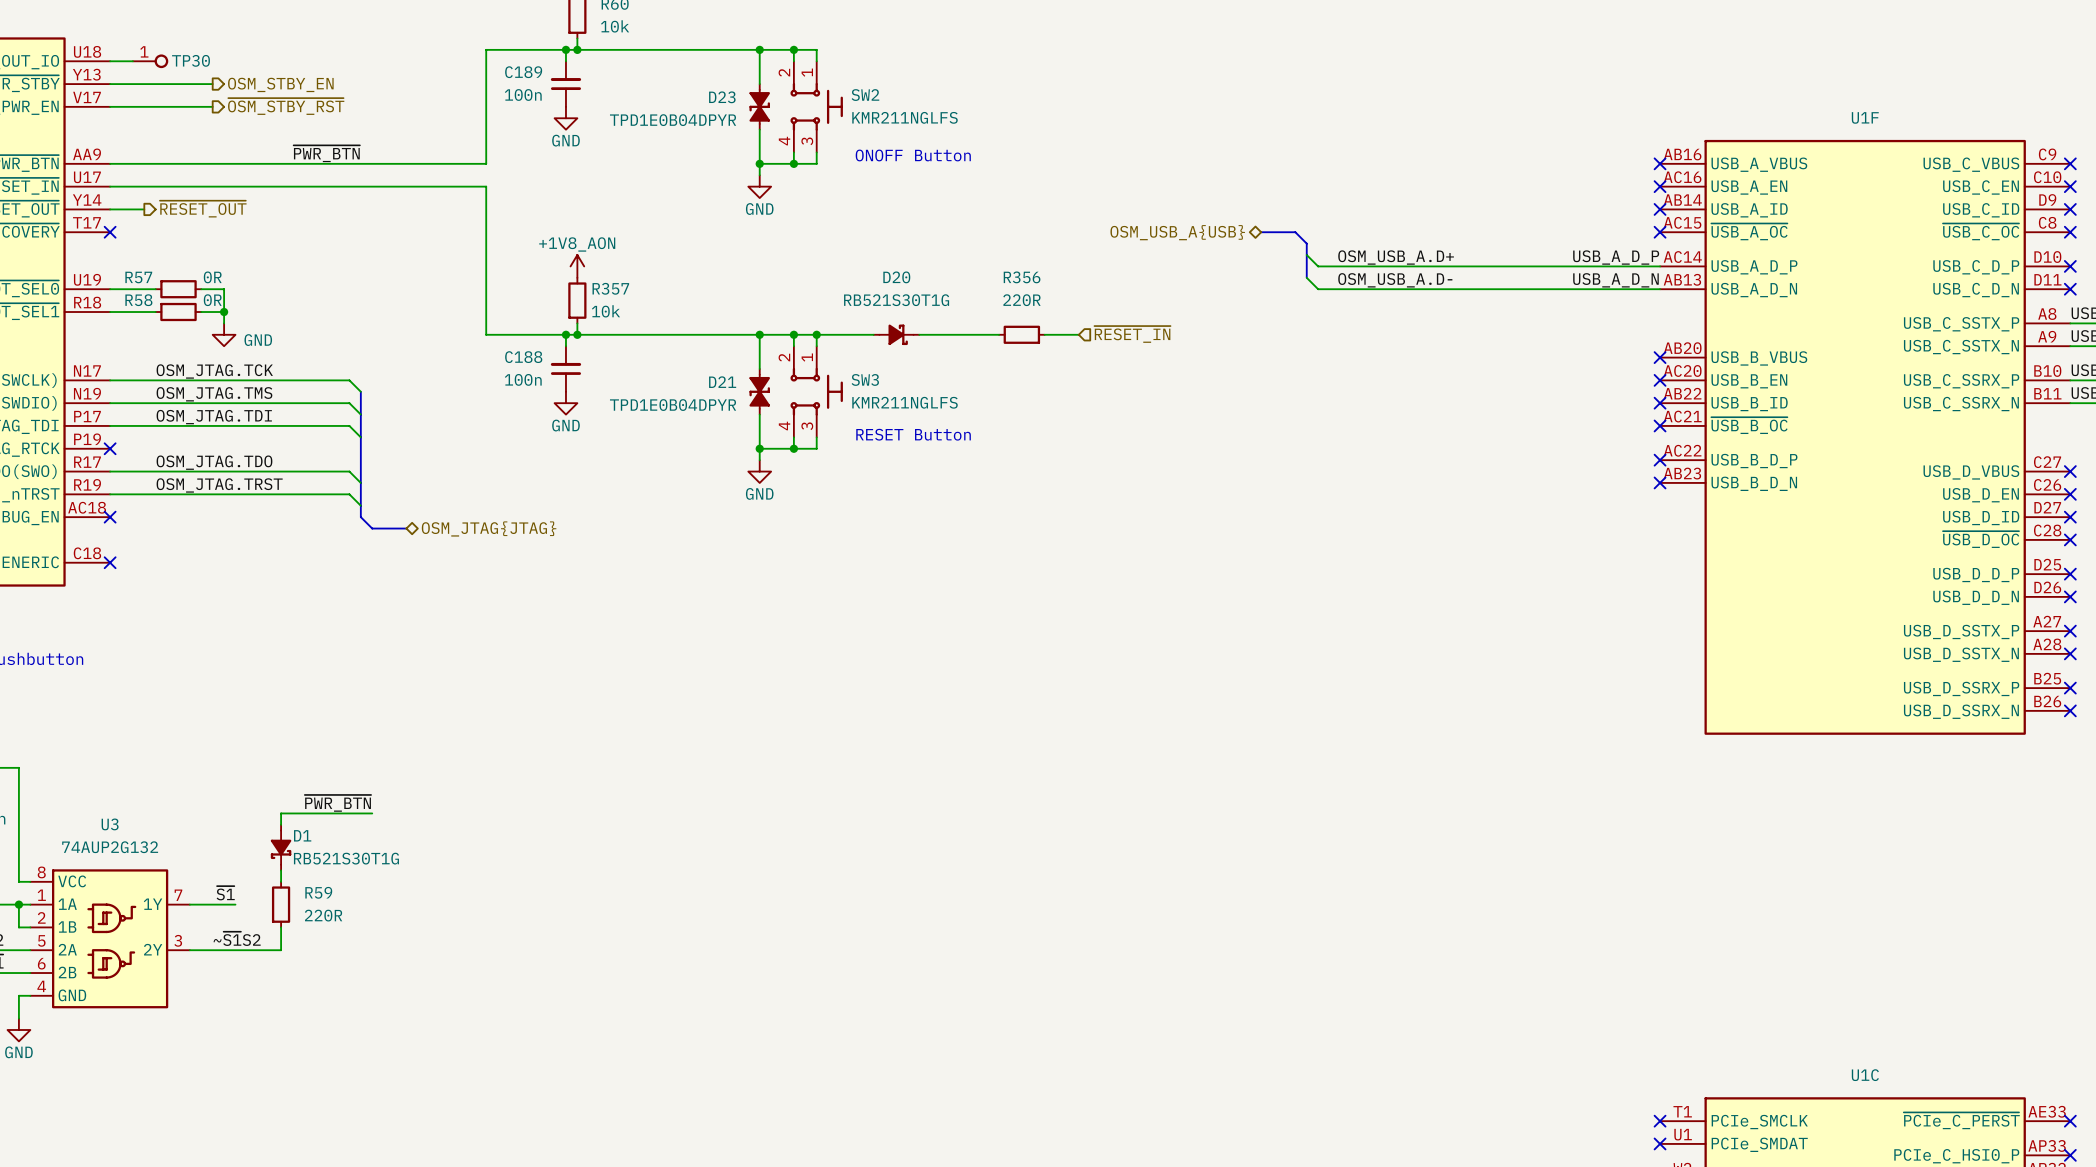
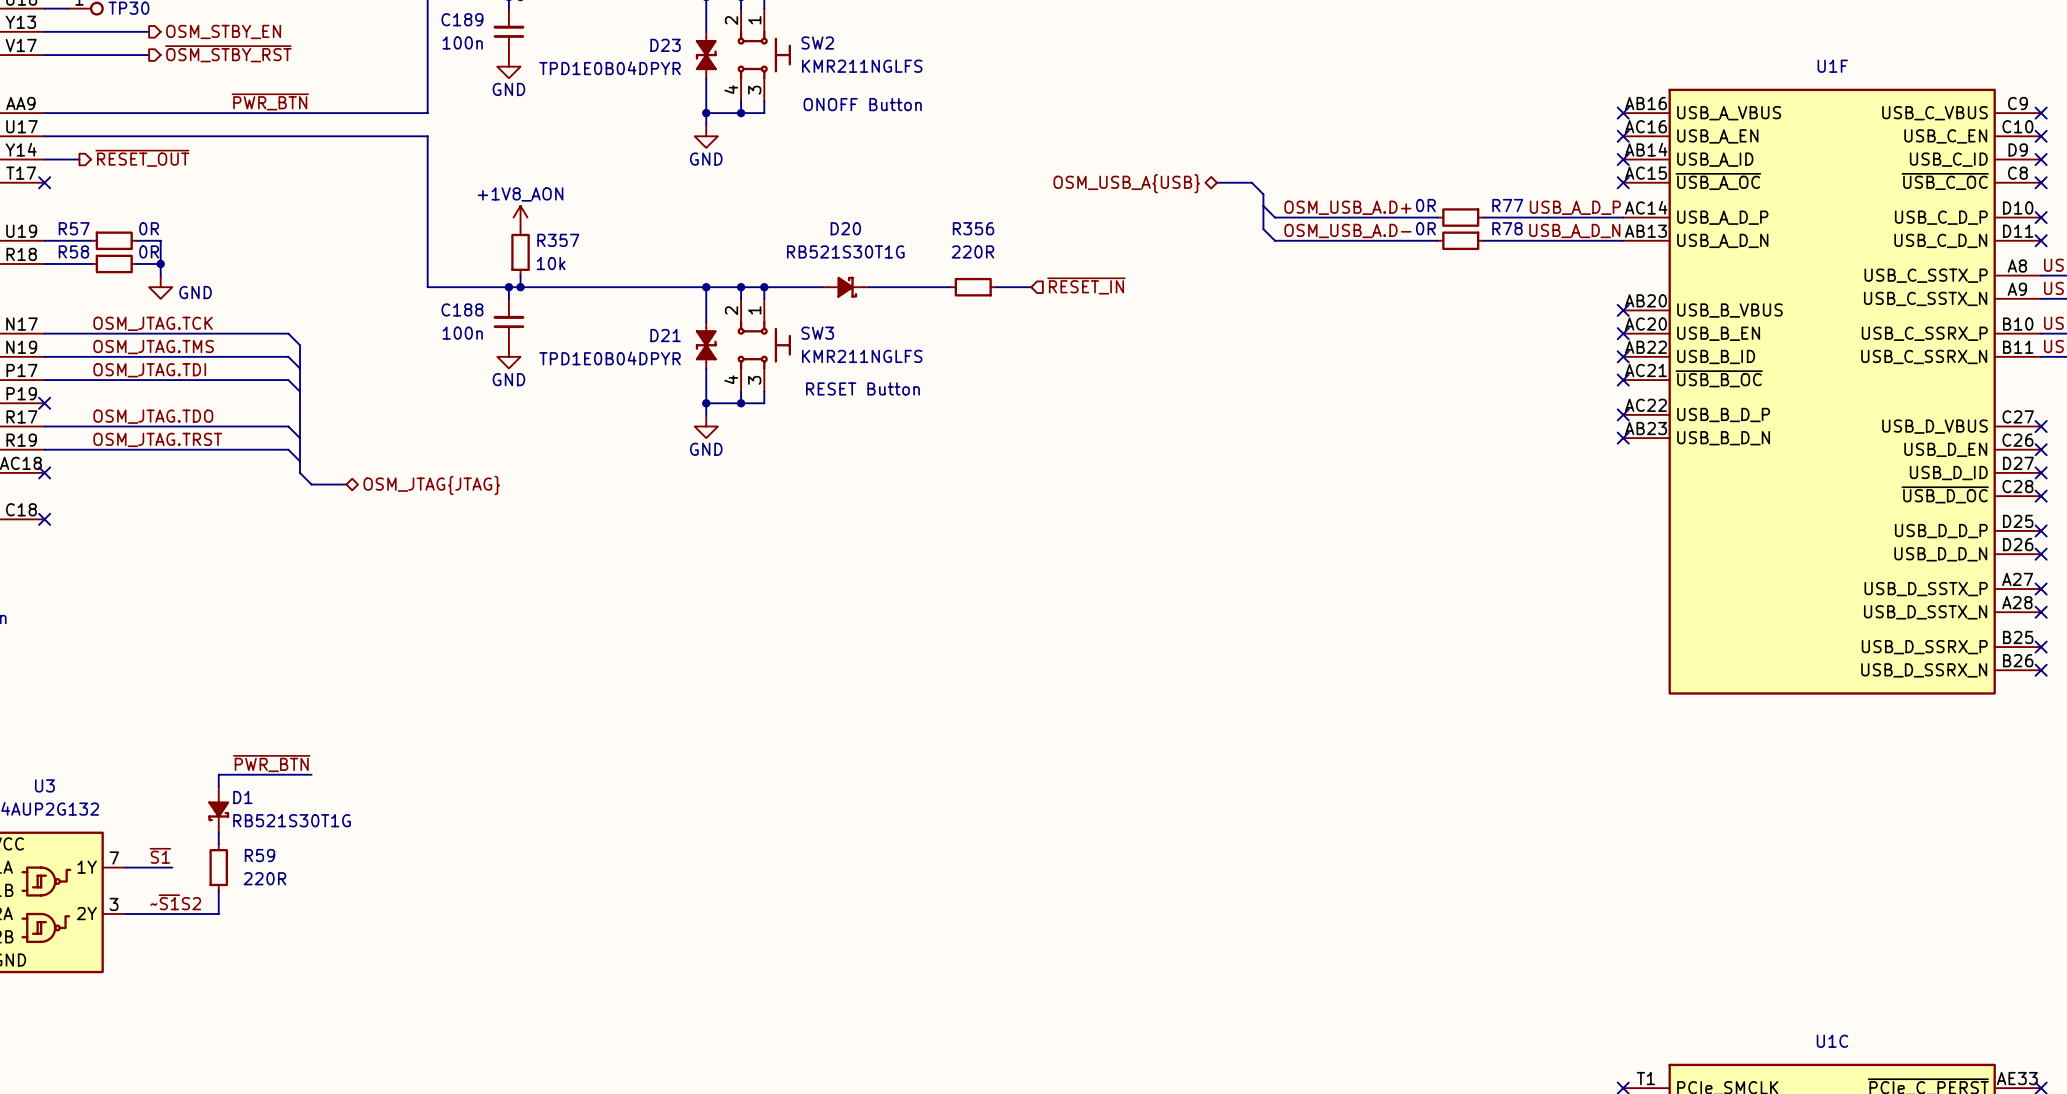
wire: (1477, 266) (1523, 266) -> none
R77: none -> (1460, 217)
wire: (1477, 289) (1523, 289) -> none
R78: none -> (1460, 240)

